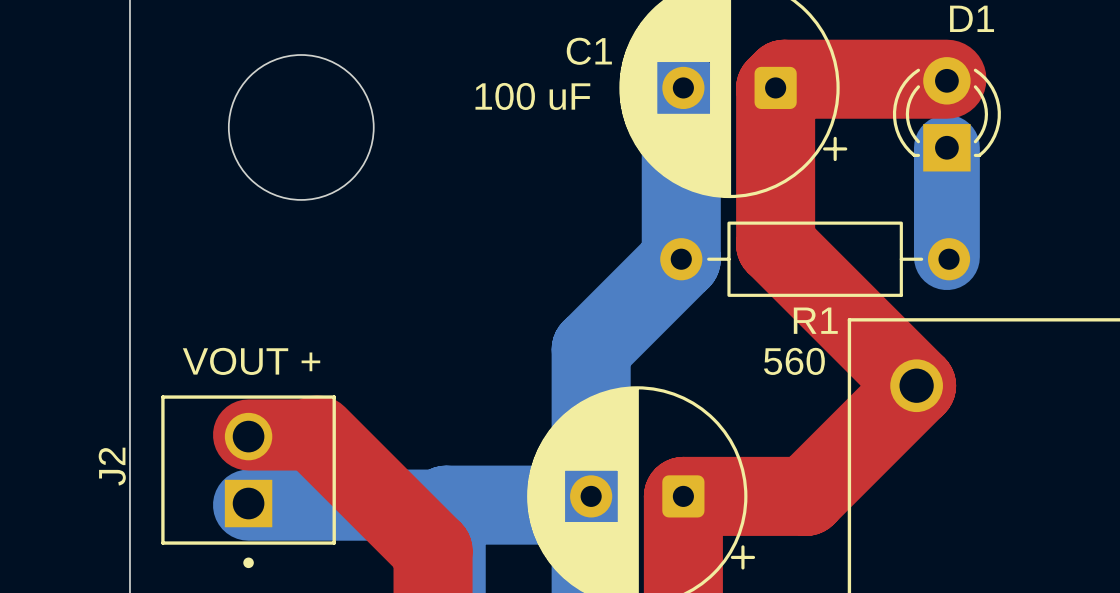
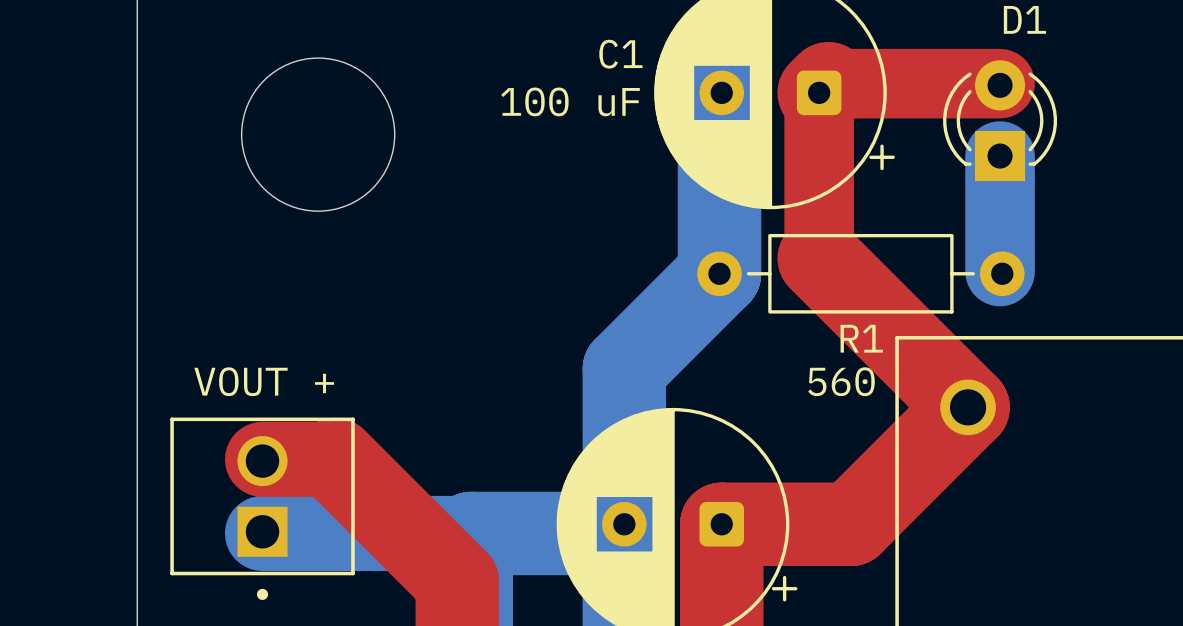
top track width: thick (784, 79) (946, 79) -> thin (828, 83) (1000, 83)
top track width: thick (775, 87) (775, 244) -> thin (819, 92) (819, 258)
J2 name: J2 (112, 466) -> none

